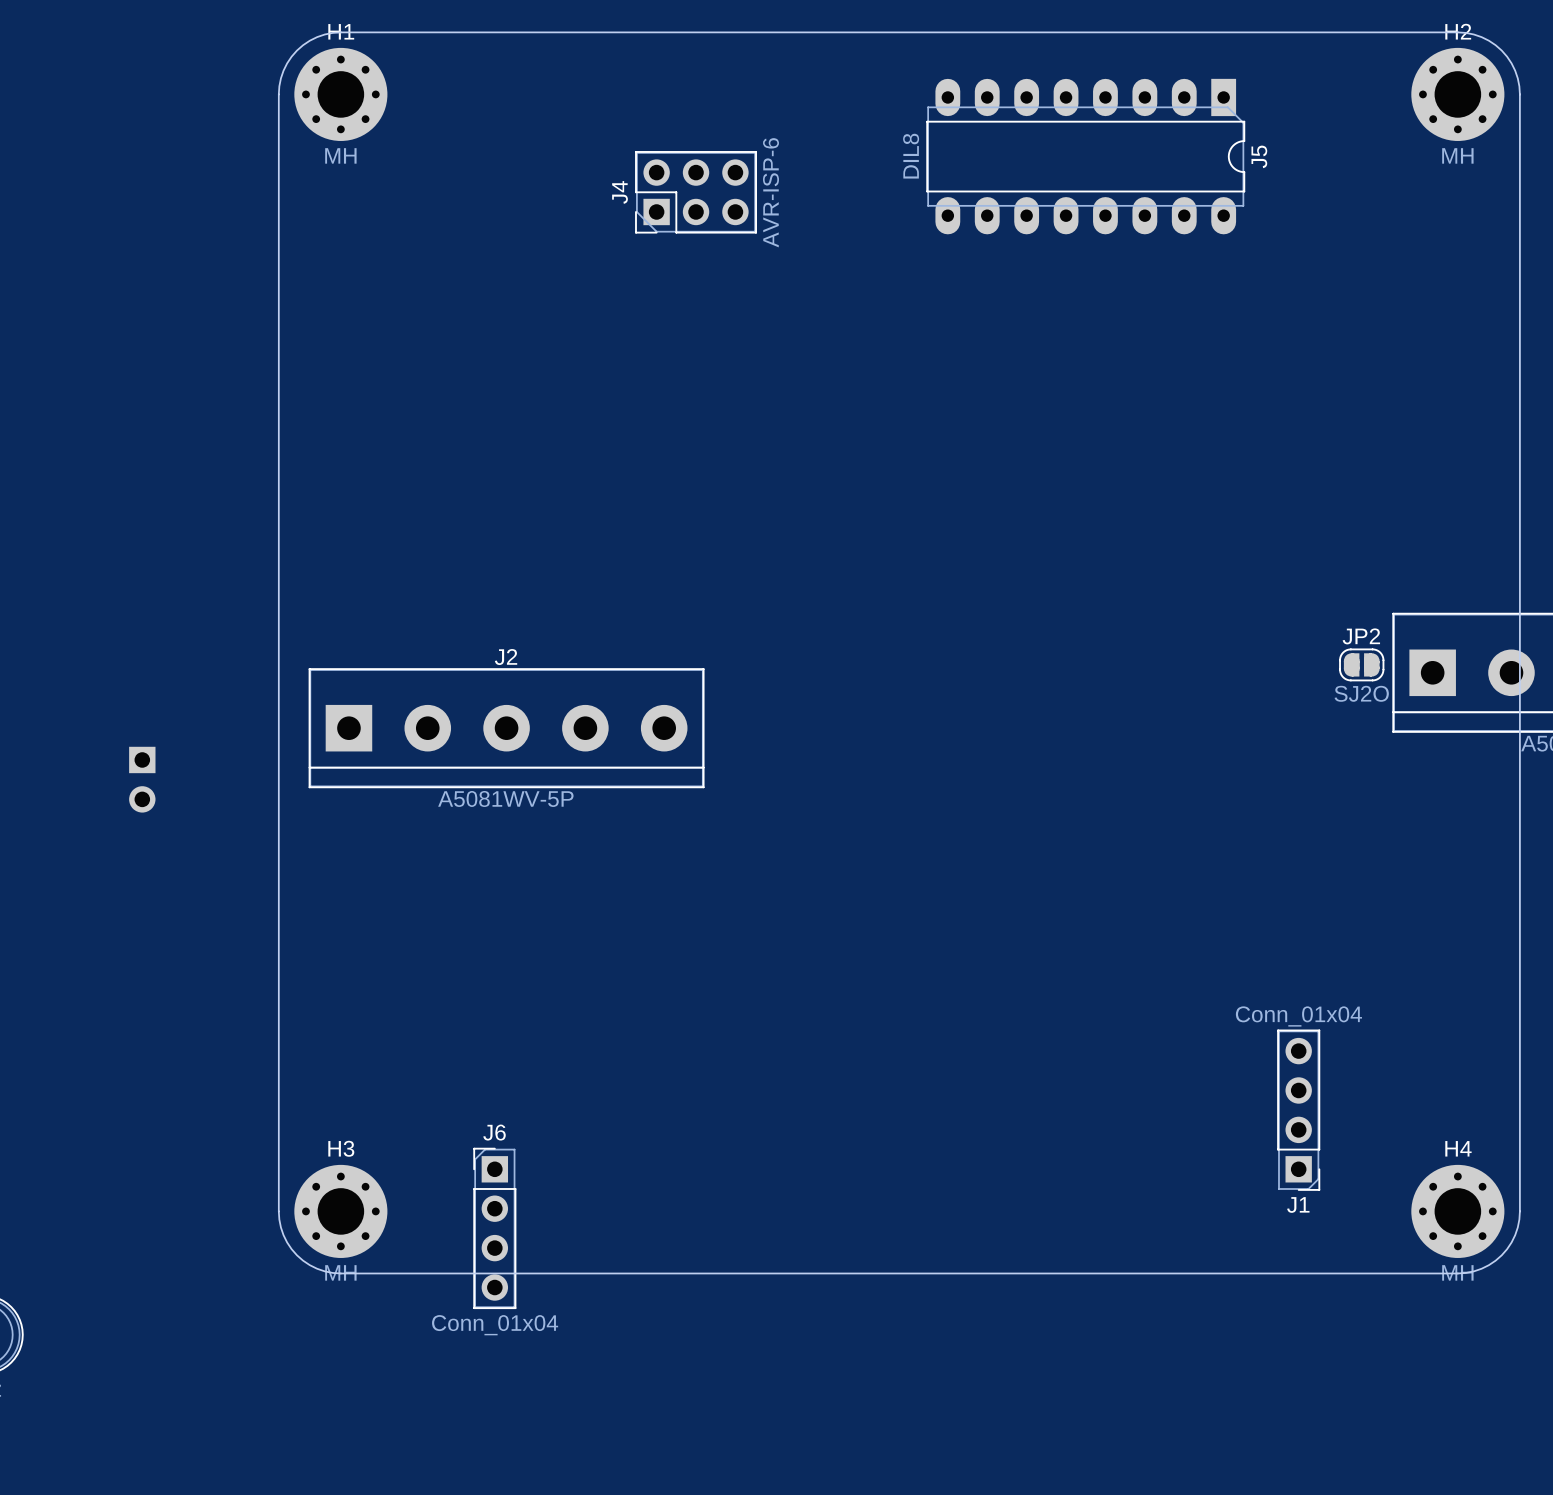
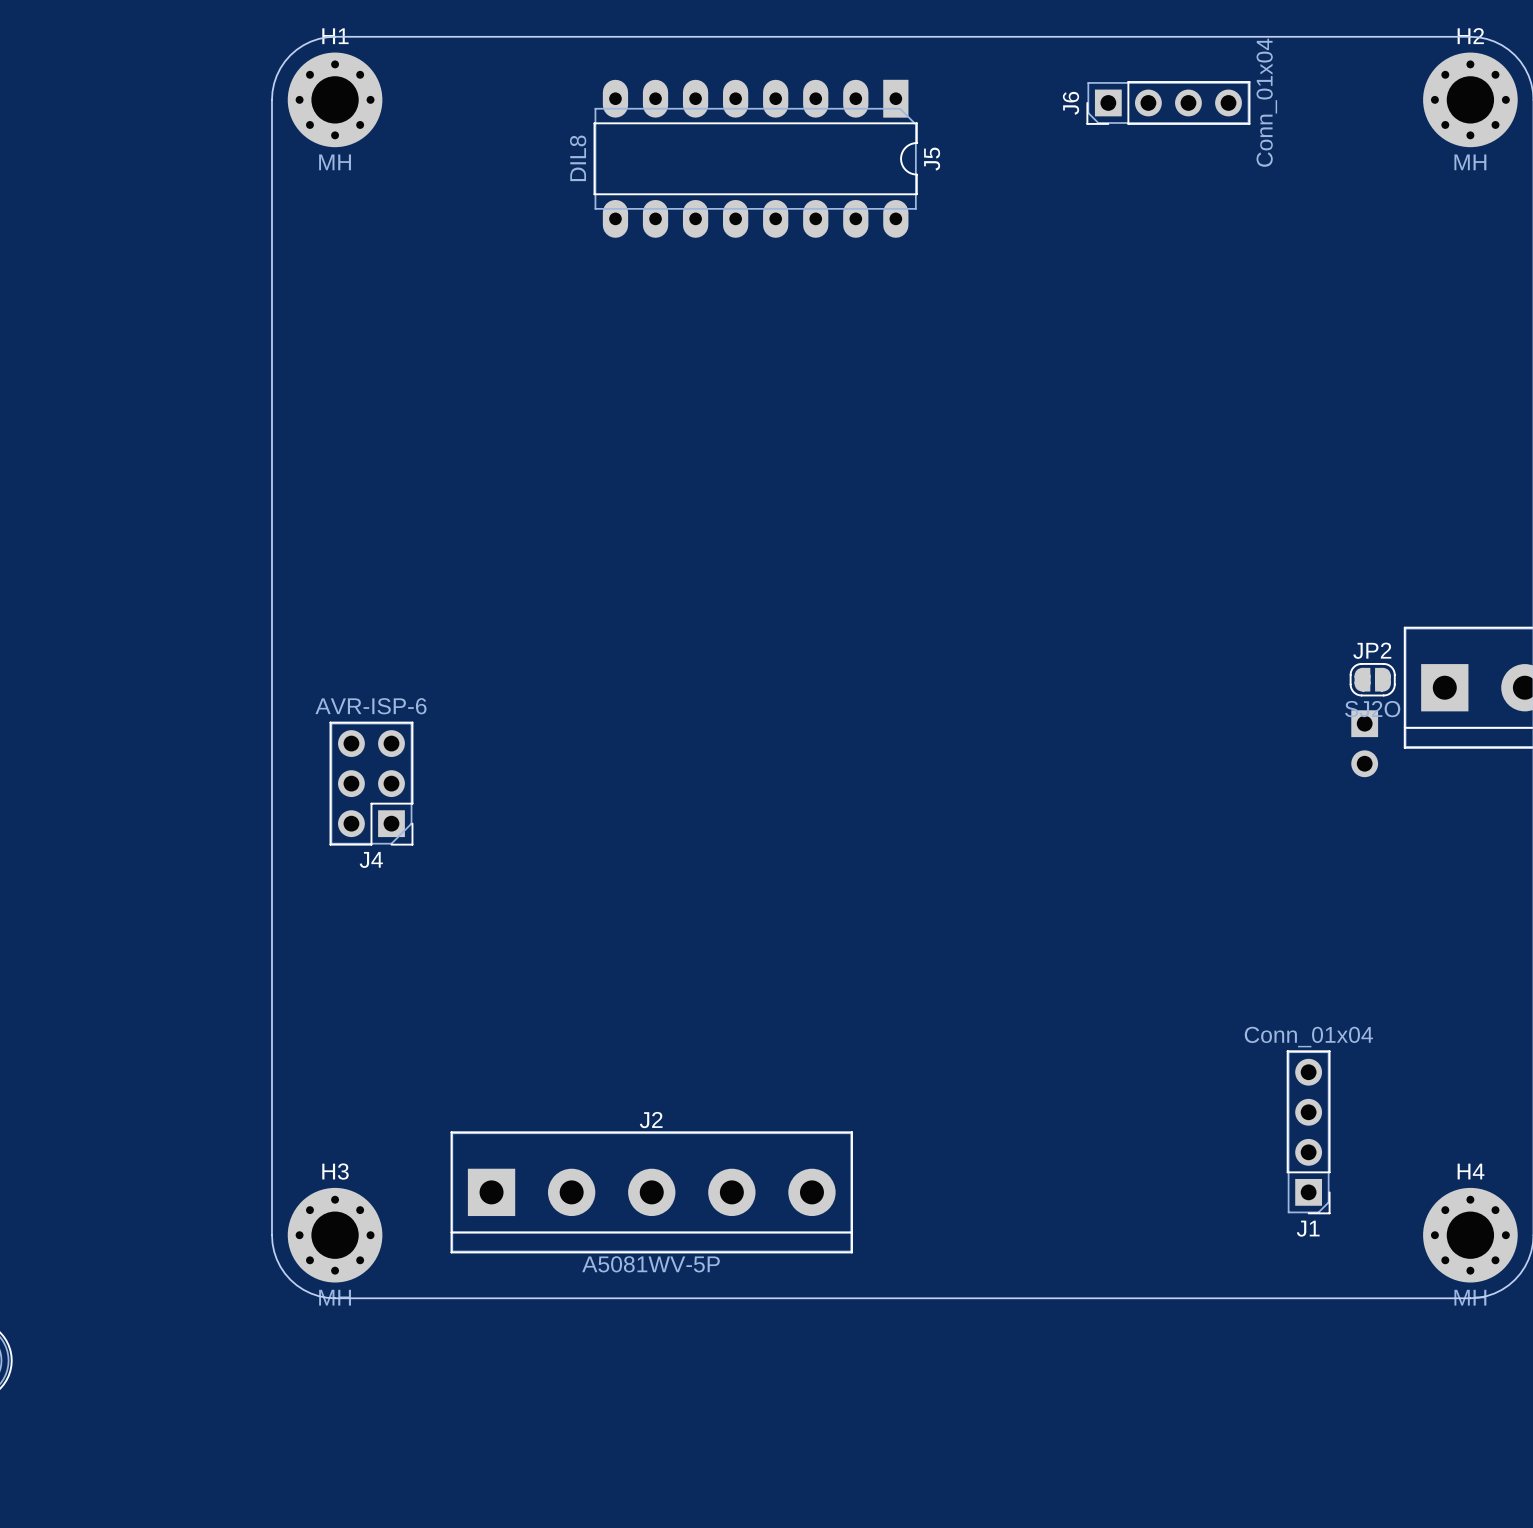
J5 position: (1085, 156) -> (755, 158)
J4 rotation: 0° (696, 192) -> 90° counterclockwise (371, 783)
J4 position: (696, 192) -> (371, 783)
part: none -> (1364, 743)
J2 position: (506, 728) -> (651, 1192)
part: (142, 779) -> none
J6 rotation: 0° (494, 1228) -> 90° counterclockwise (1168, 102)
J6 position: (494, 1228) -> (1168, 102)

